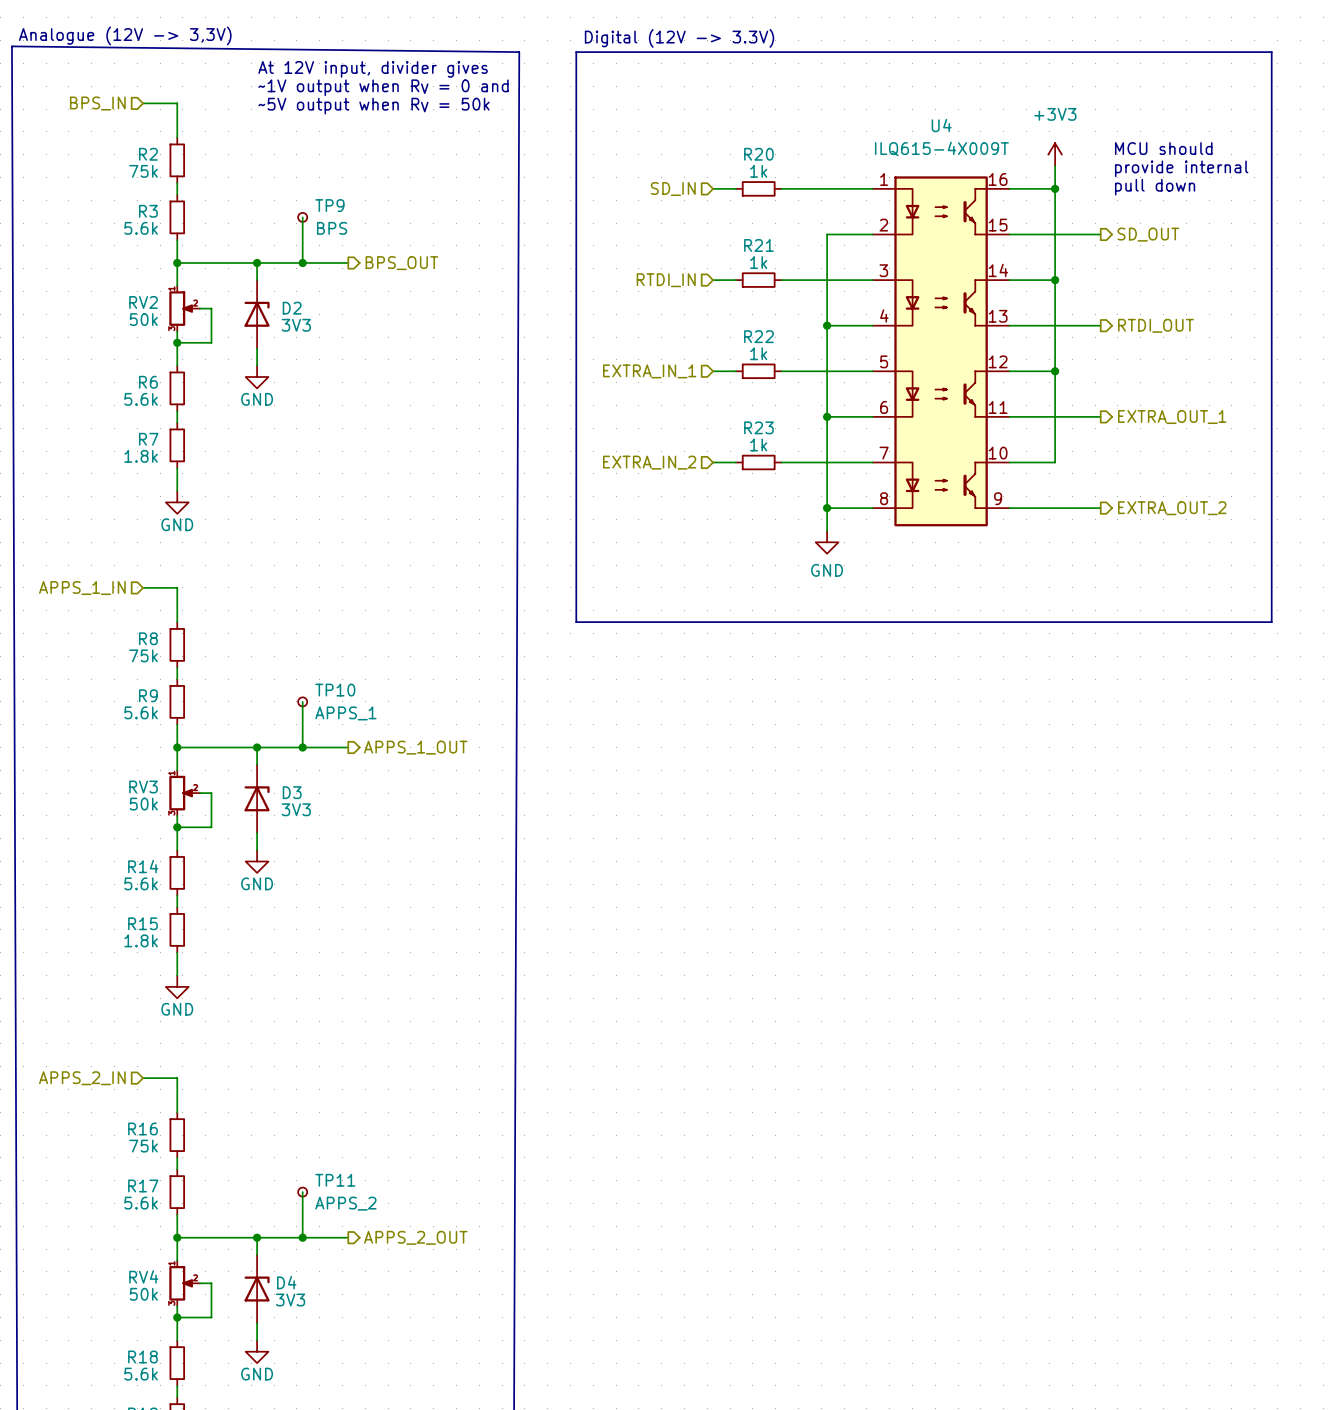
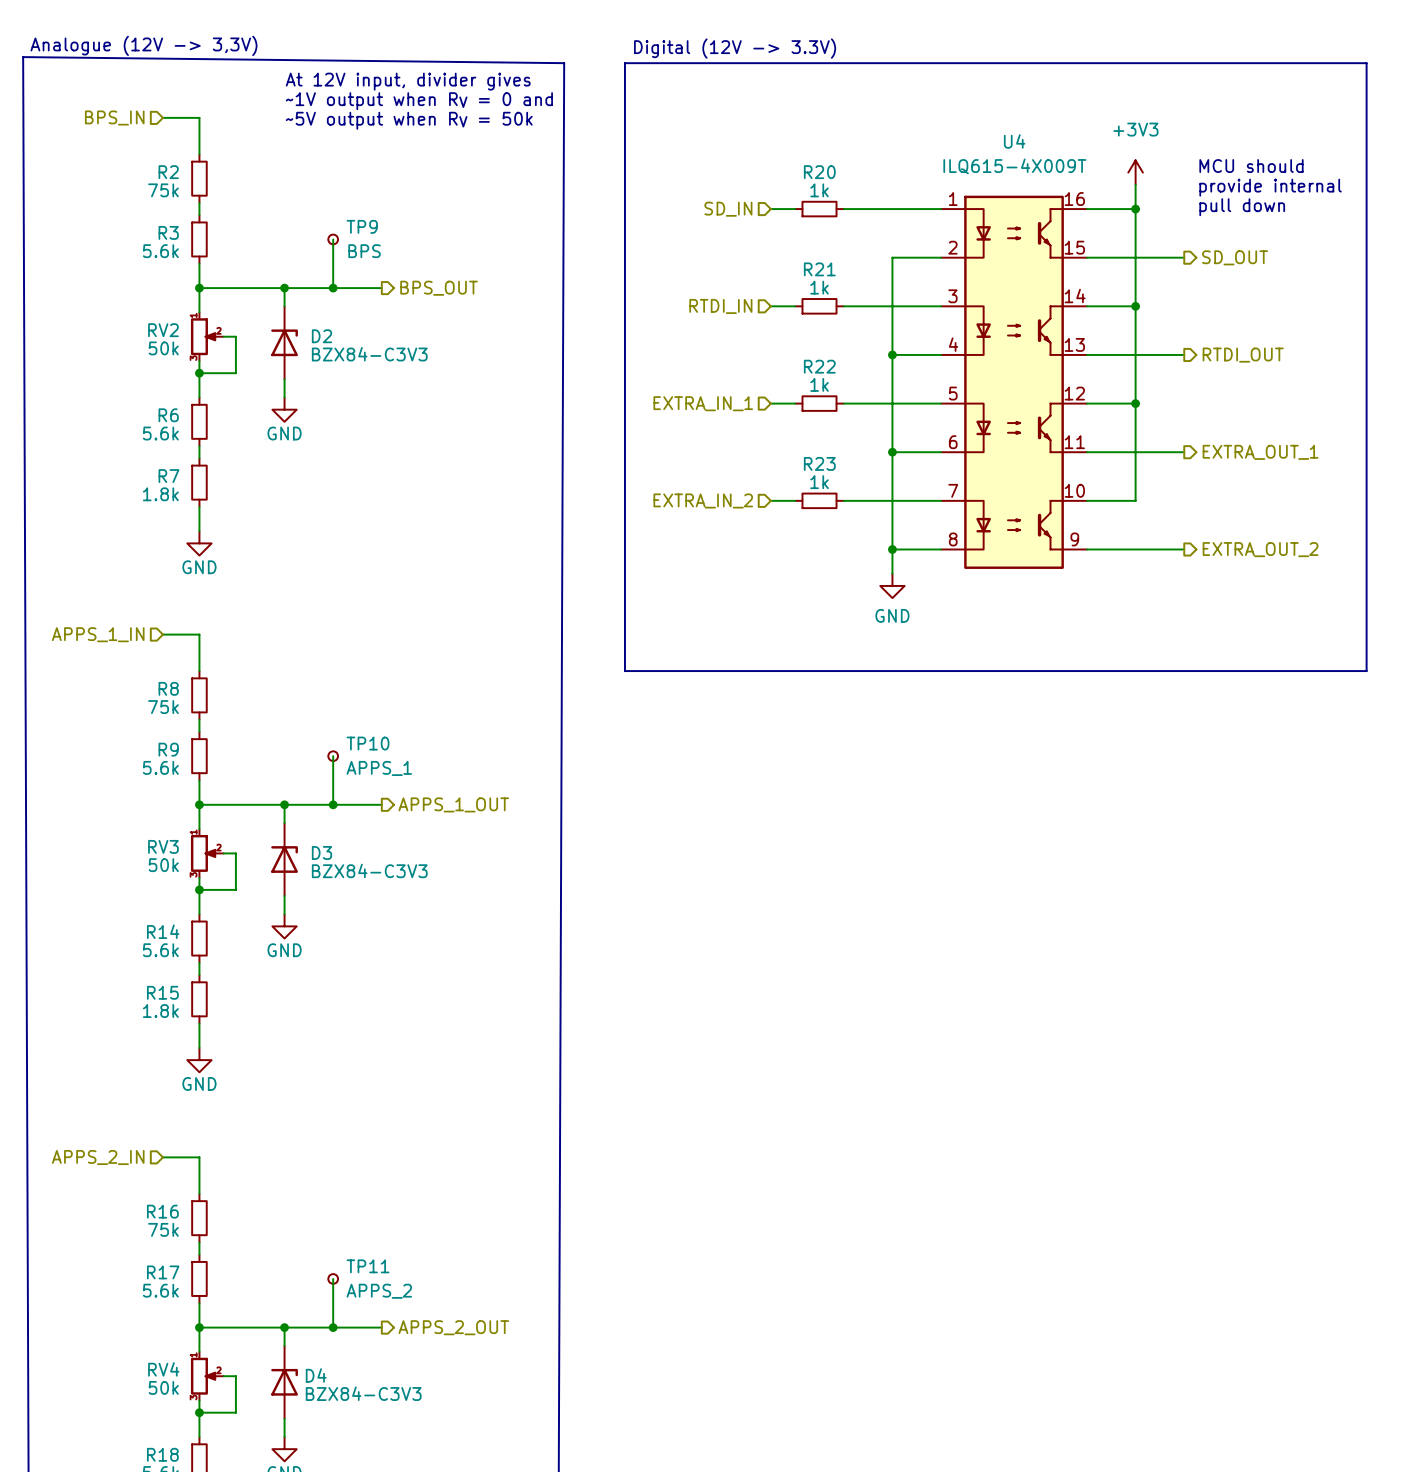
D2 value: 3V3 (296, 325) -> BZX84-C3V3 (369, 354)
D3 value: 3V3 (296, 809) -> BZX84-C3V3 (369, 870)
D4 value: 3V3 (290, 1299) -> BZX84-C3V3 (363, 1393)

